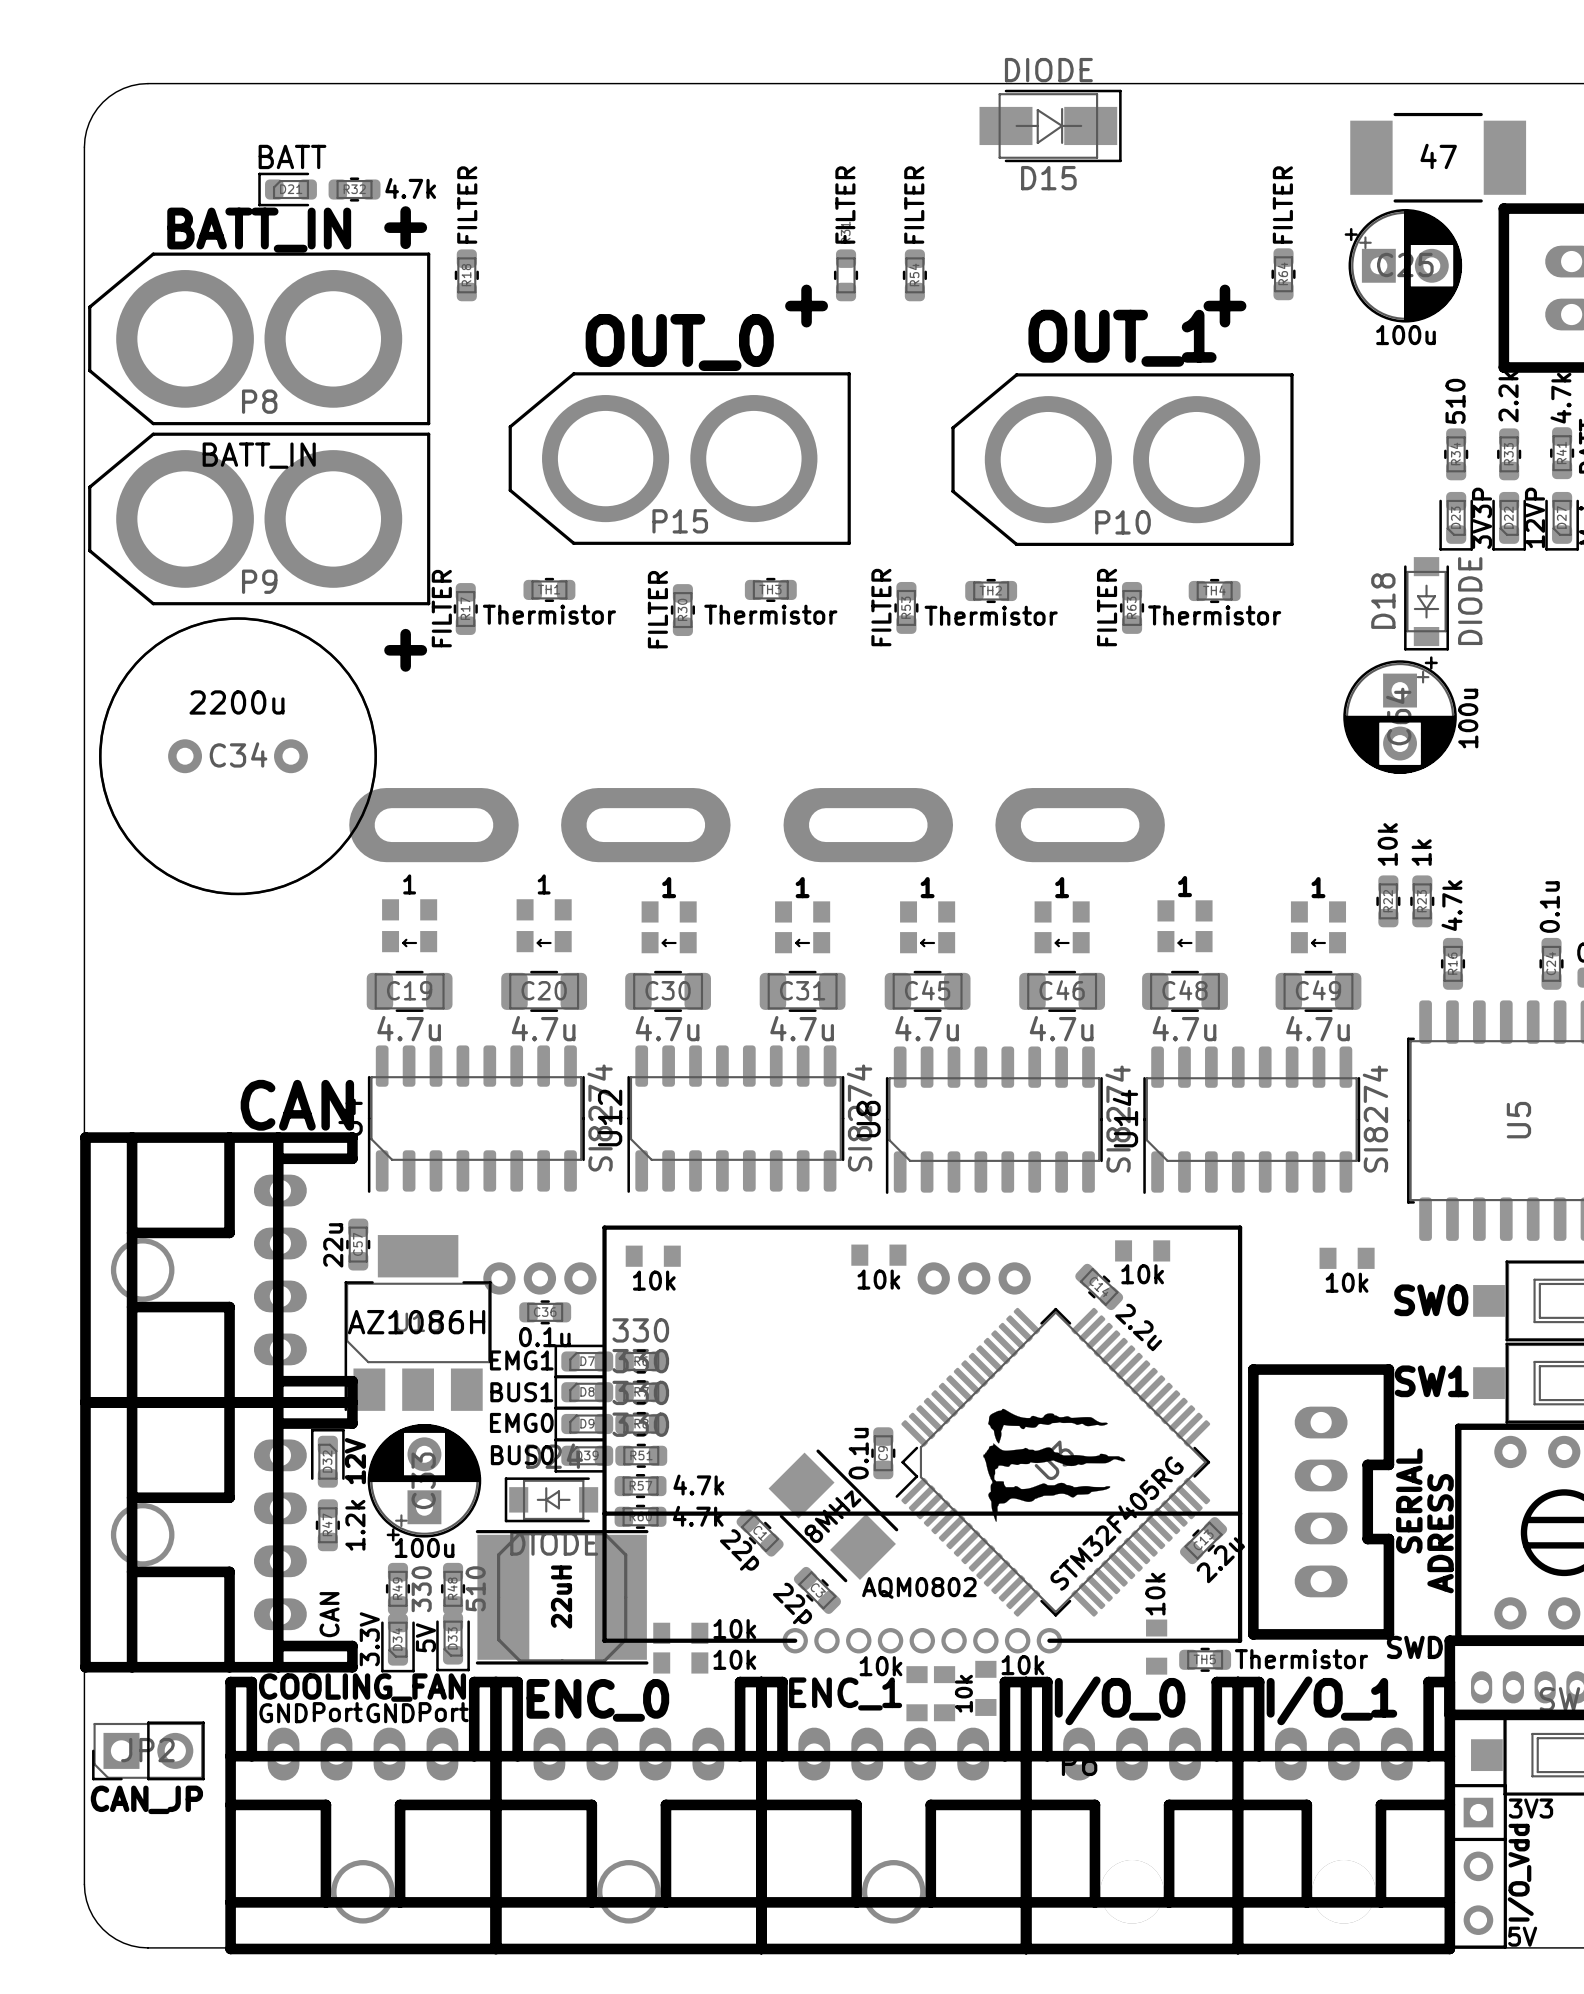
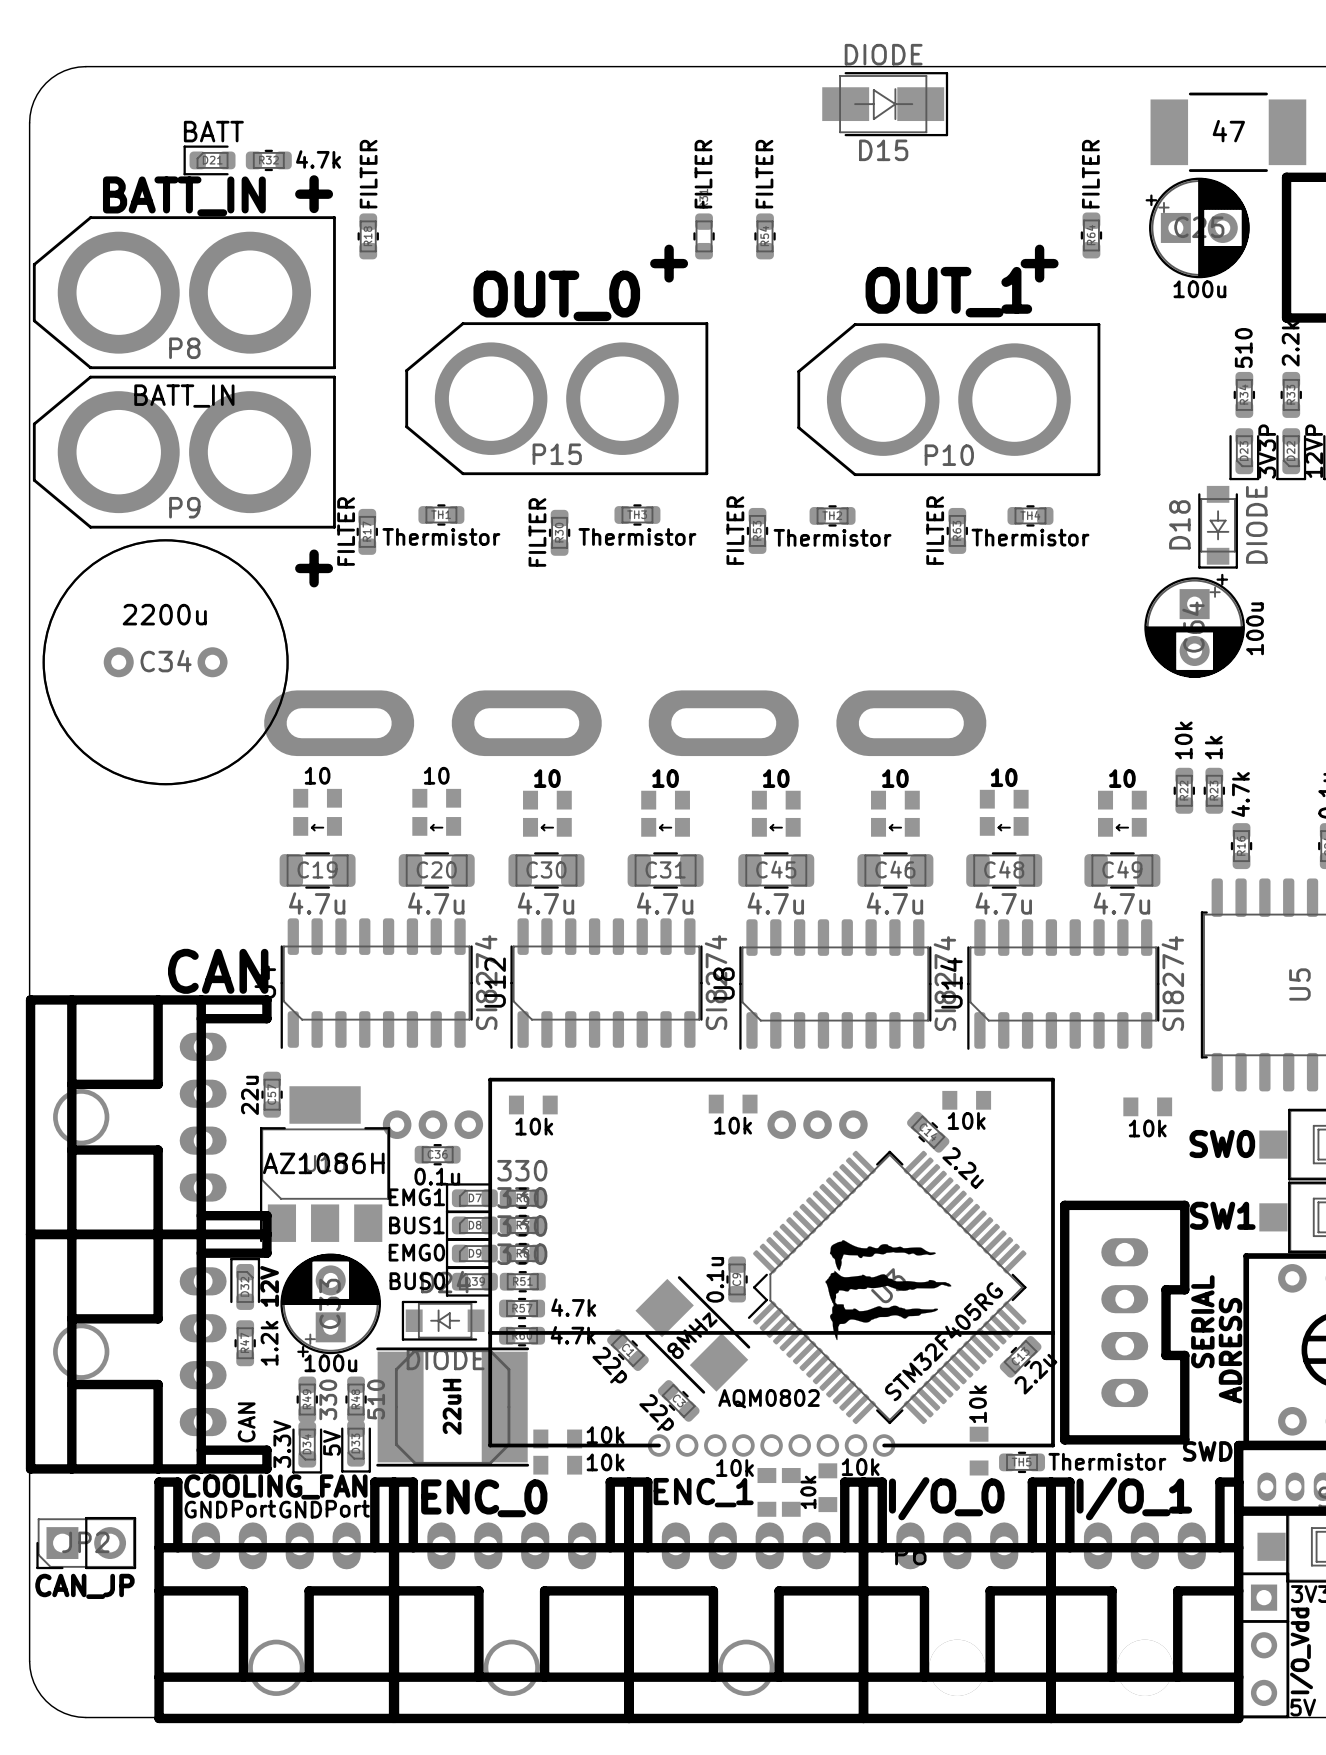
part value: 1 (409, 884) -> 10 (317, 775)
part value: 1 (544, 884) -> 10 (436, 775)
part value: 1 (1185, 886) -> 10 (1004, 777)
part value: 1 (669, 887) -> 10 (547, 778)
part value: 1 (802, 887) -> 10 (665, 778)
part value: 1 (927, 887) -> 10 (776, 778)
part value: 1 (1062, 887) -> 10 (895, 778)
part value: 1 (1318, 887) -> 10 (1122, 778)

